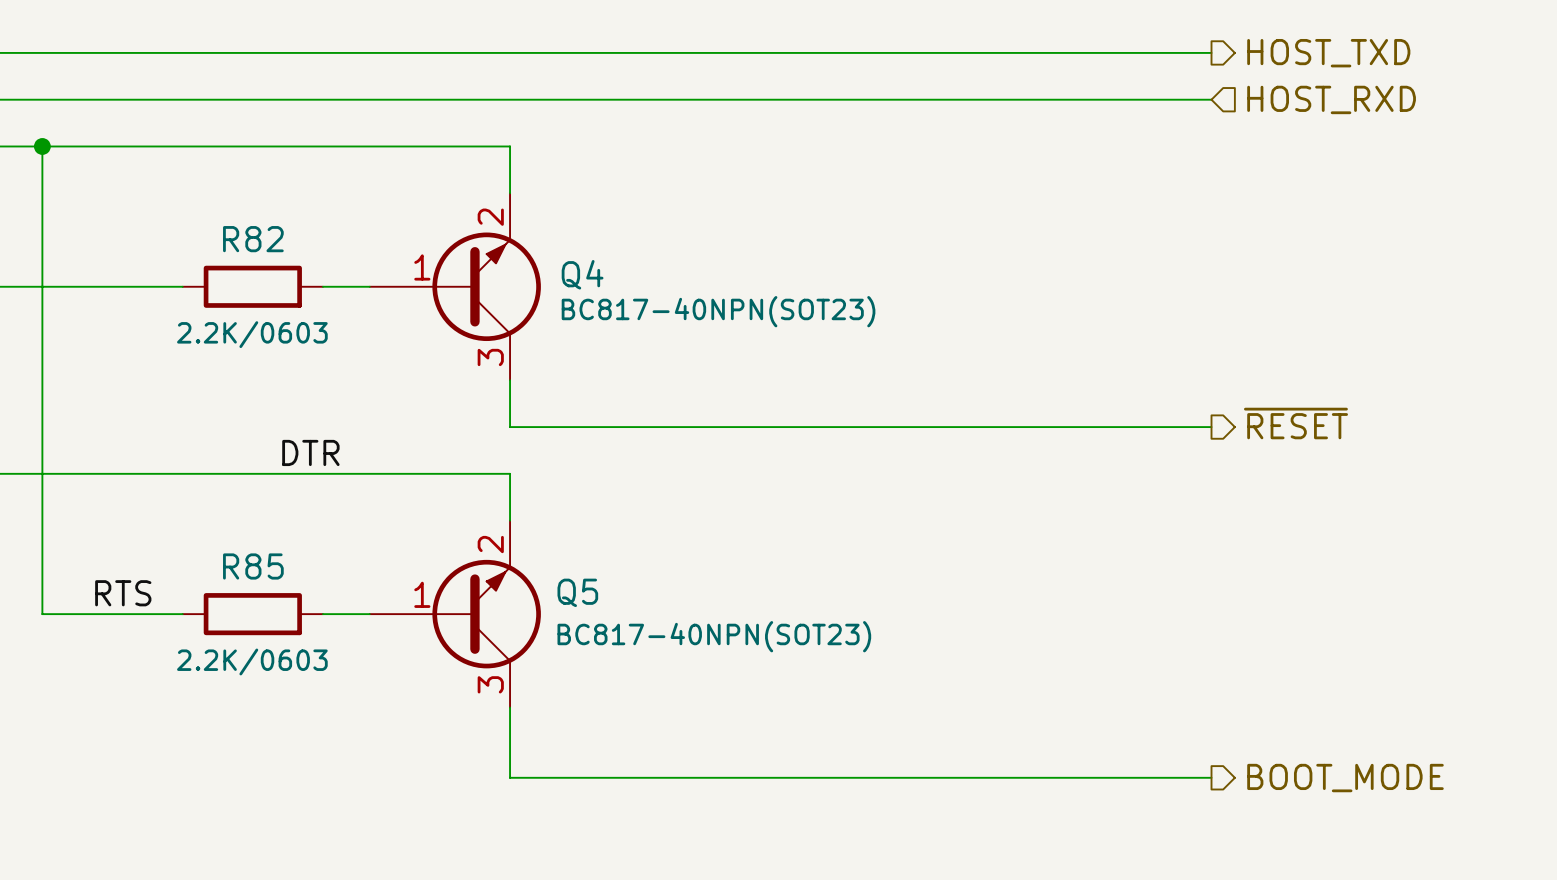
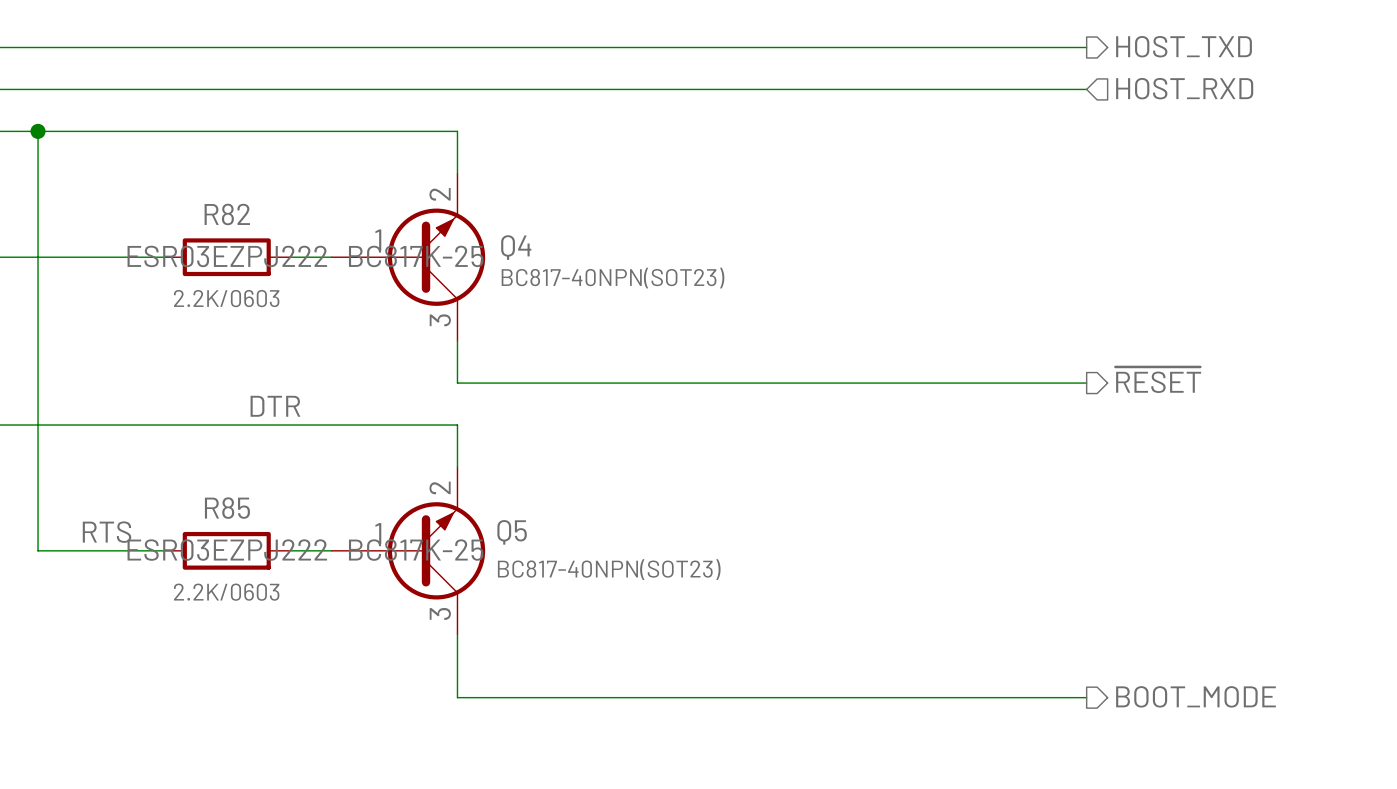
R82 text: none -> ESR03EZPJ222 (227, 256)
Q4 text: none -> BC817K-25 (416, 256)
R85 text: none -> ESR03EZPJ222 (227, 550)
Q5 text: none -> BC817K-25 (416, 550)

